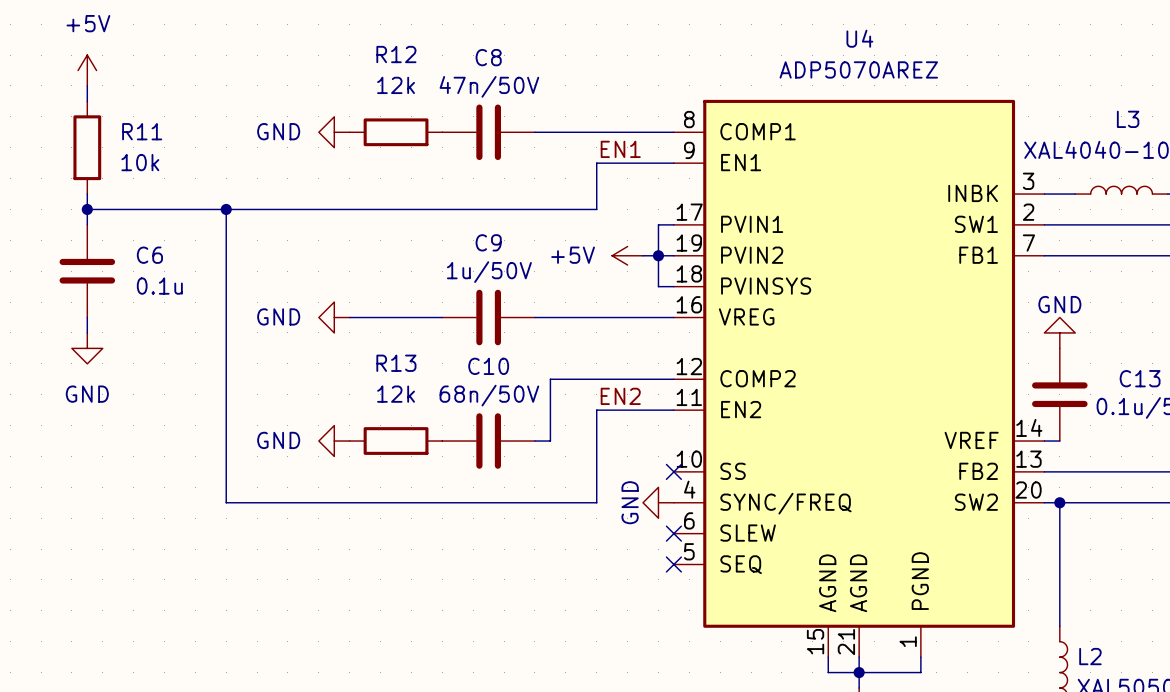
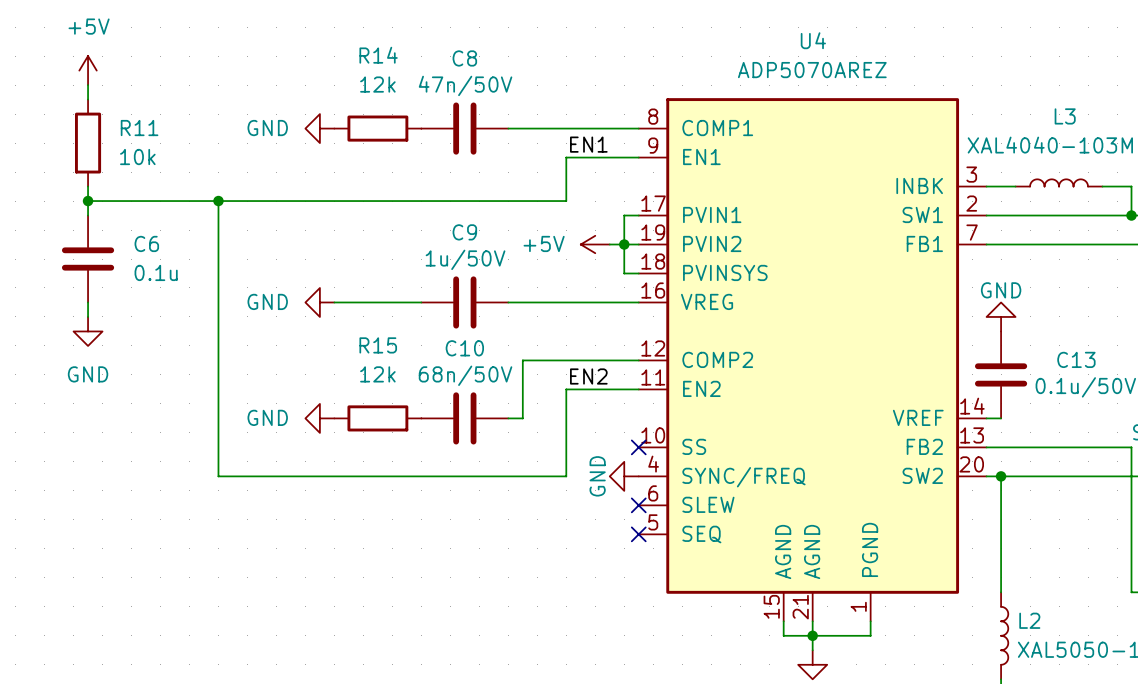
R12 name: R12 (396, 54) -> R14 (378, 55)
R13 name: R13 (396, 363) -> R15 (378, 345)

